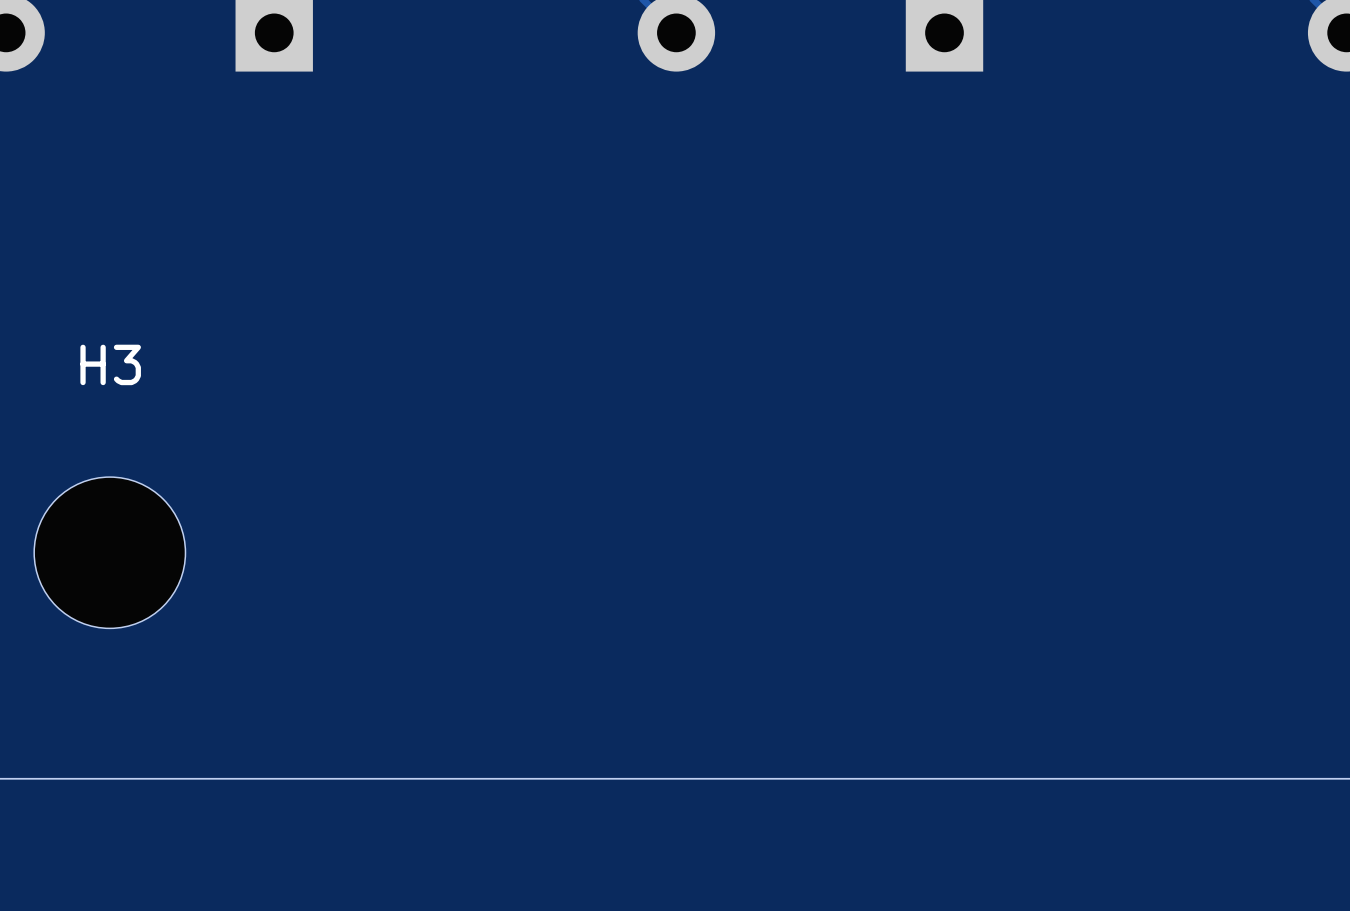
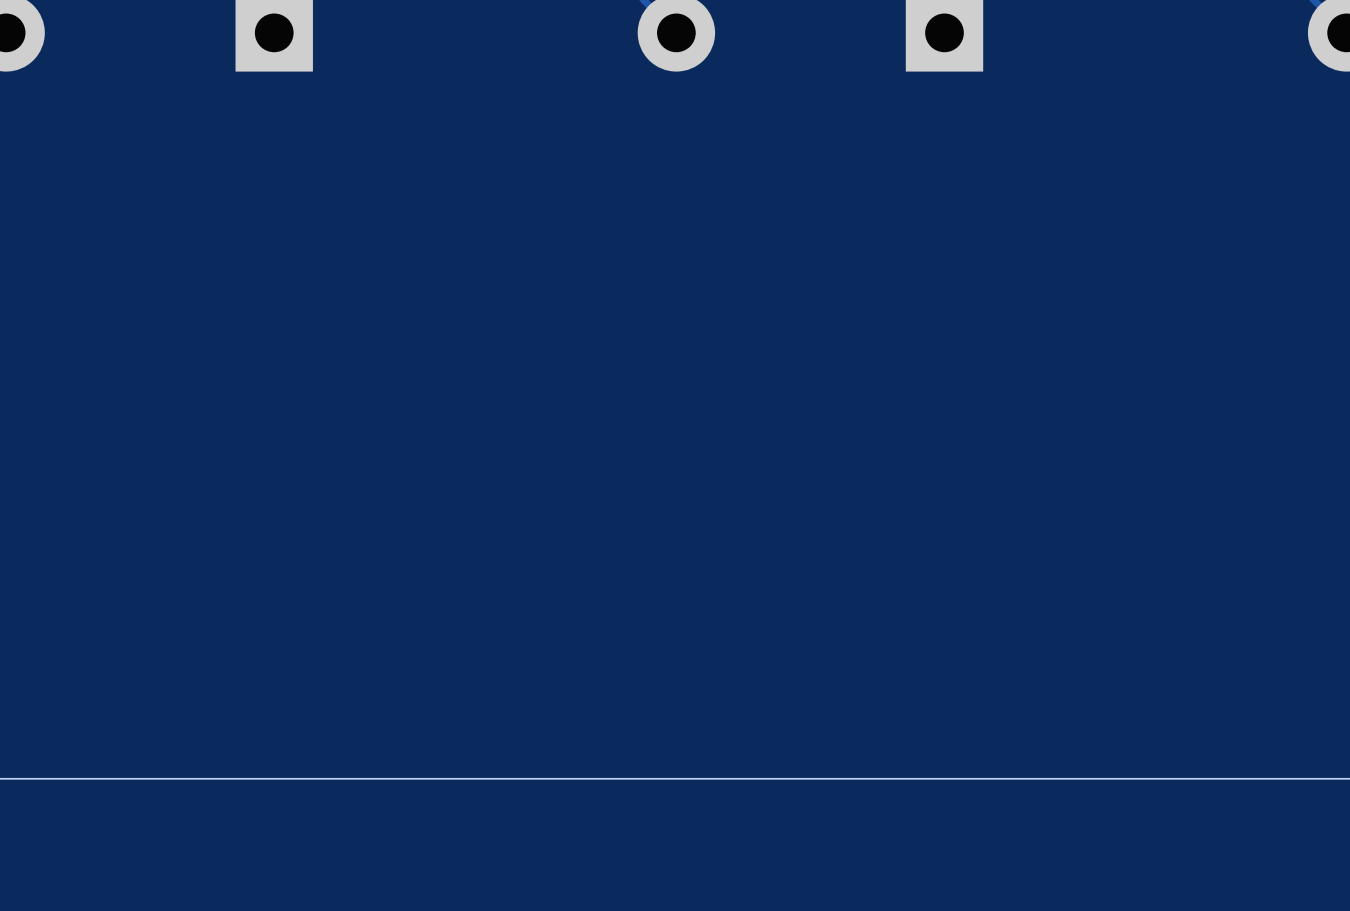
H3: (109, 552) -> none

